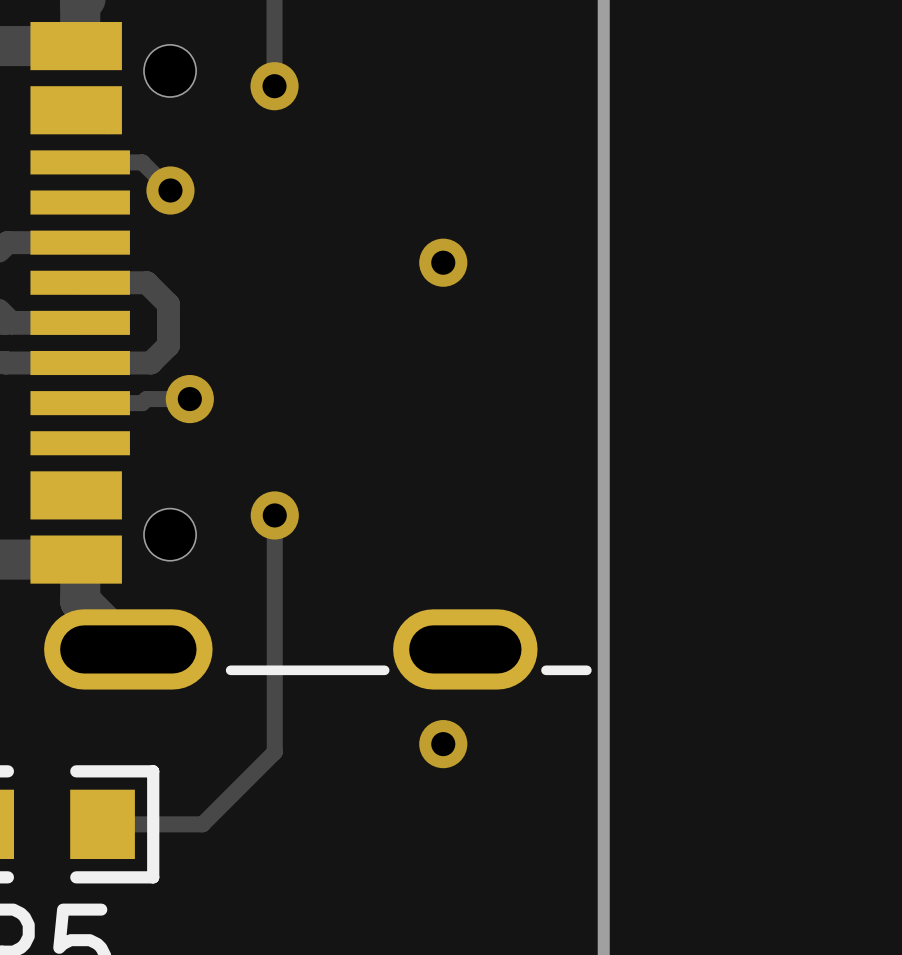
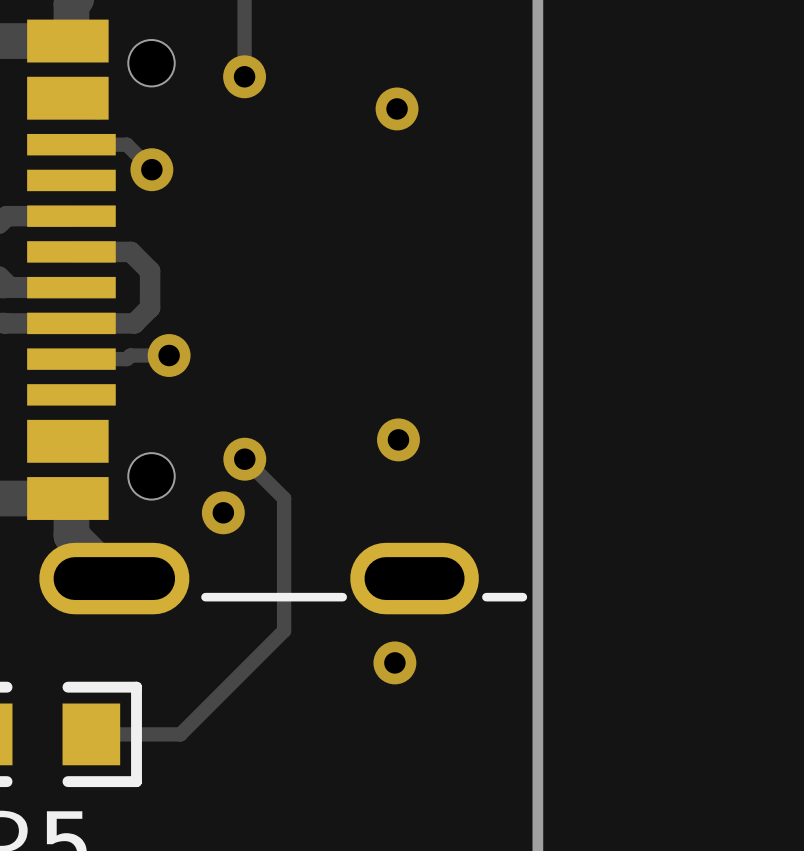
via: none -> (397, 108)
via: (443, 262) -> none
via: none -> (398, 439)
track: (274, 515) (274, 752) -> (244, 459) (284, 498) (284, 630) (244, 670)
via: none -> (223, 512)

